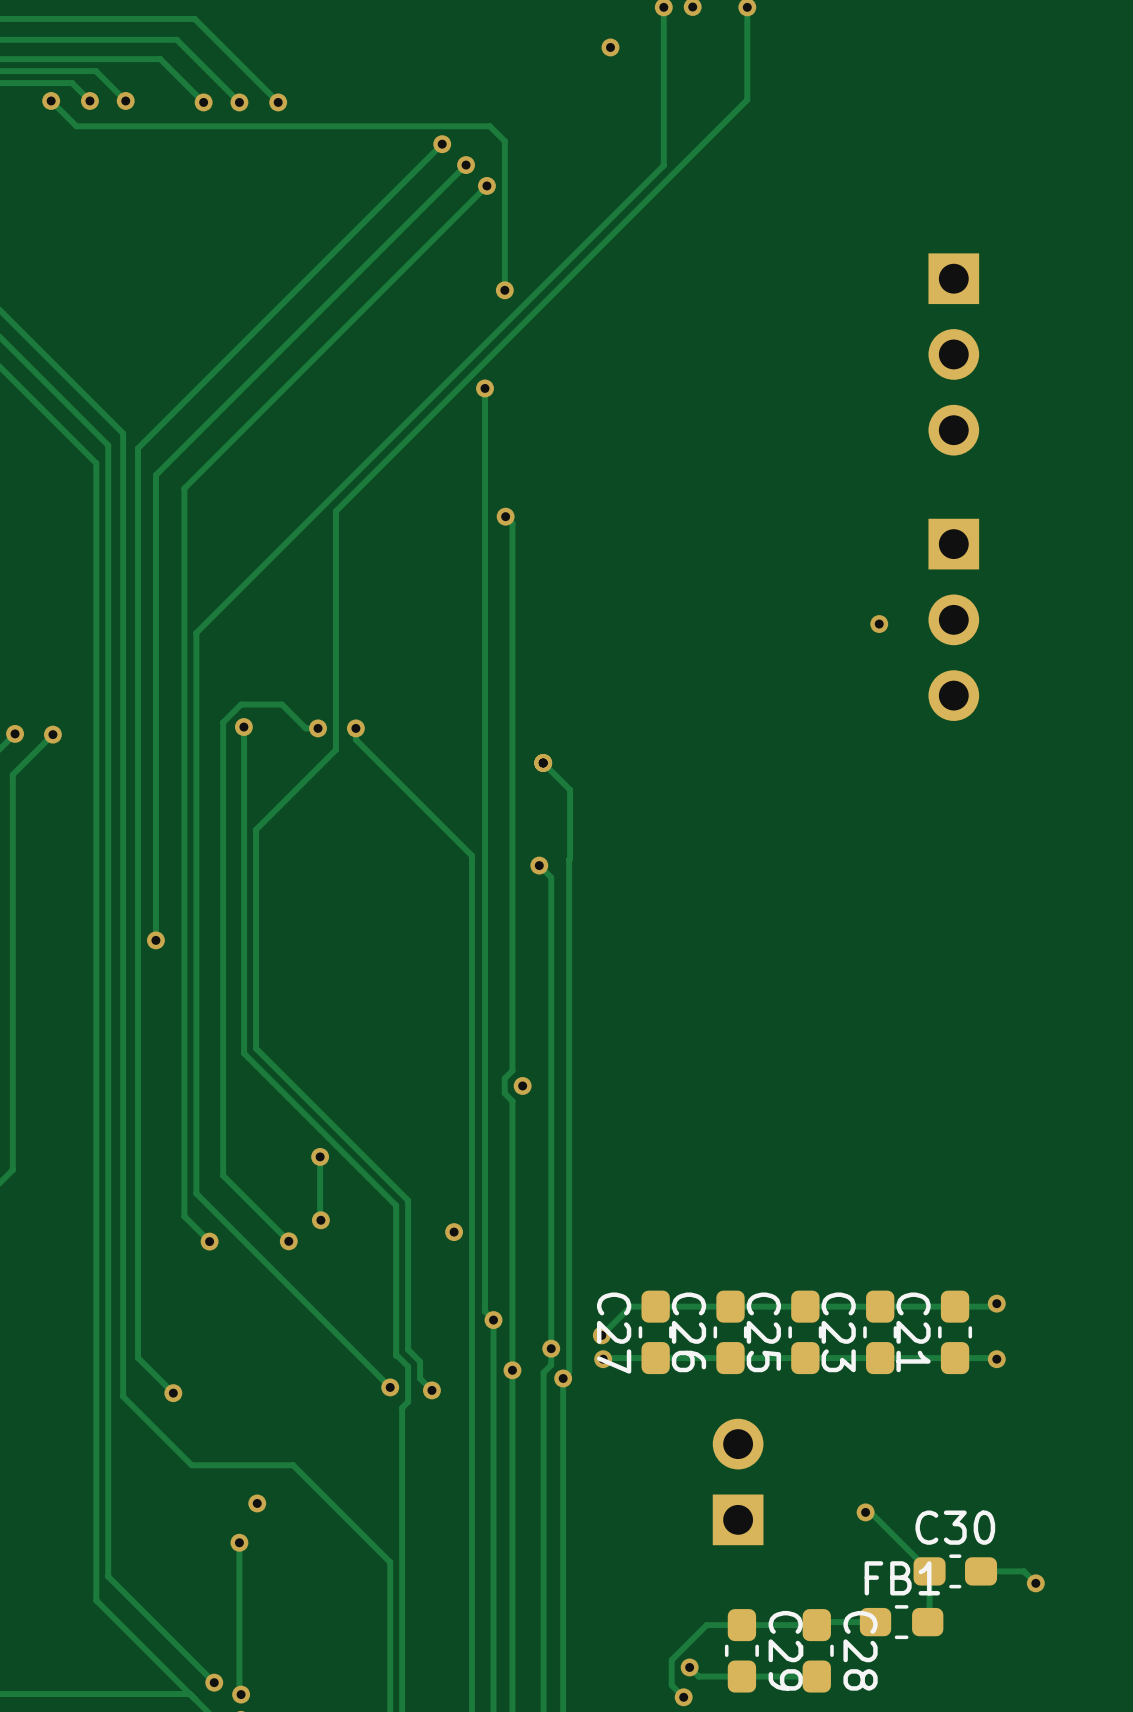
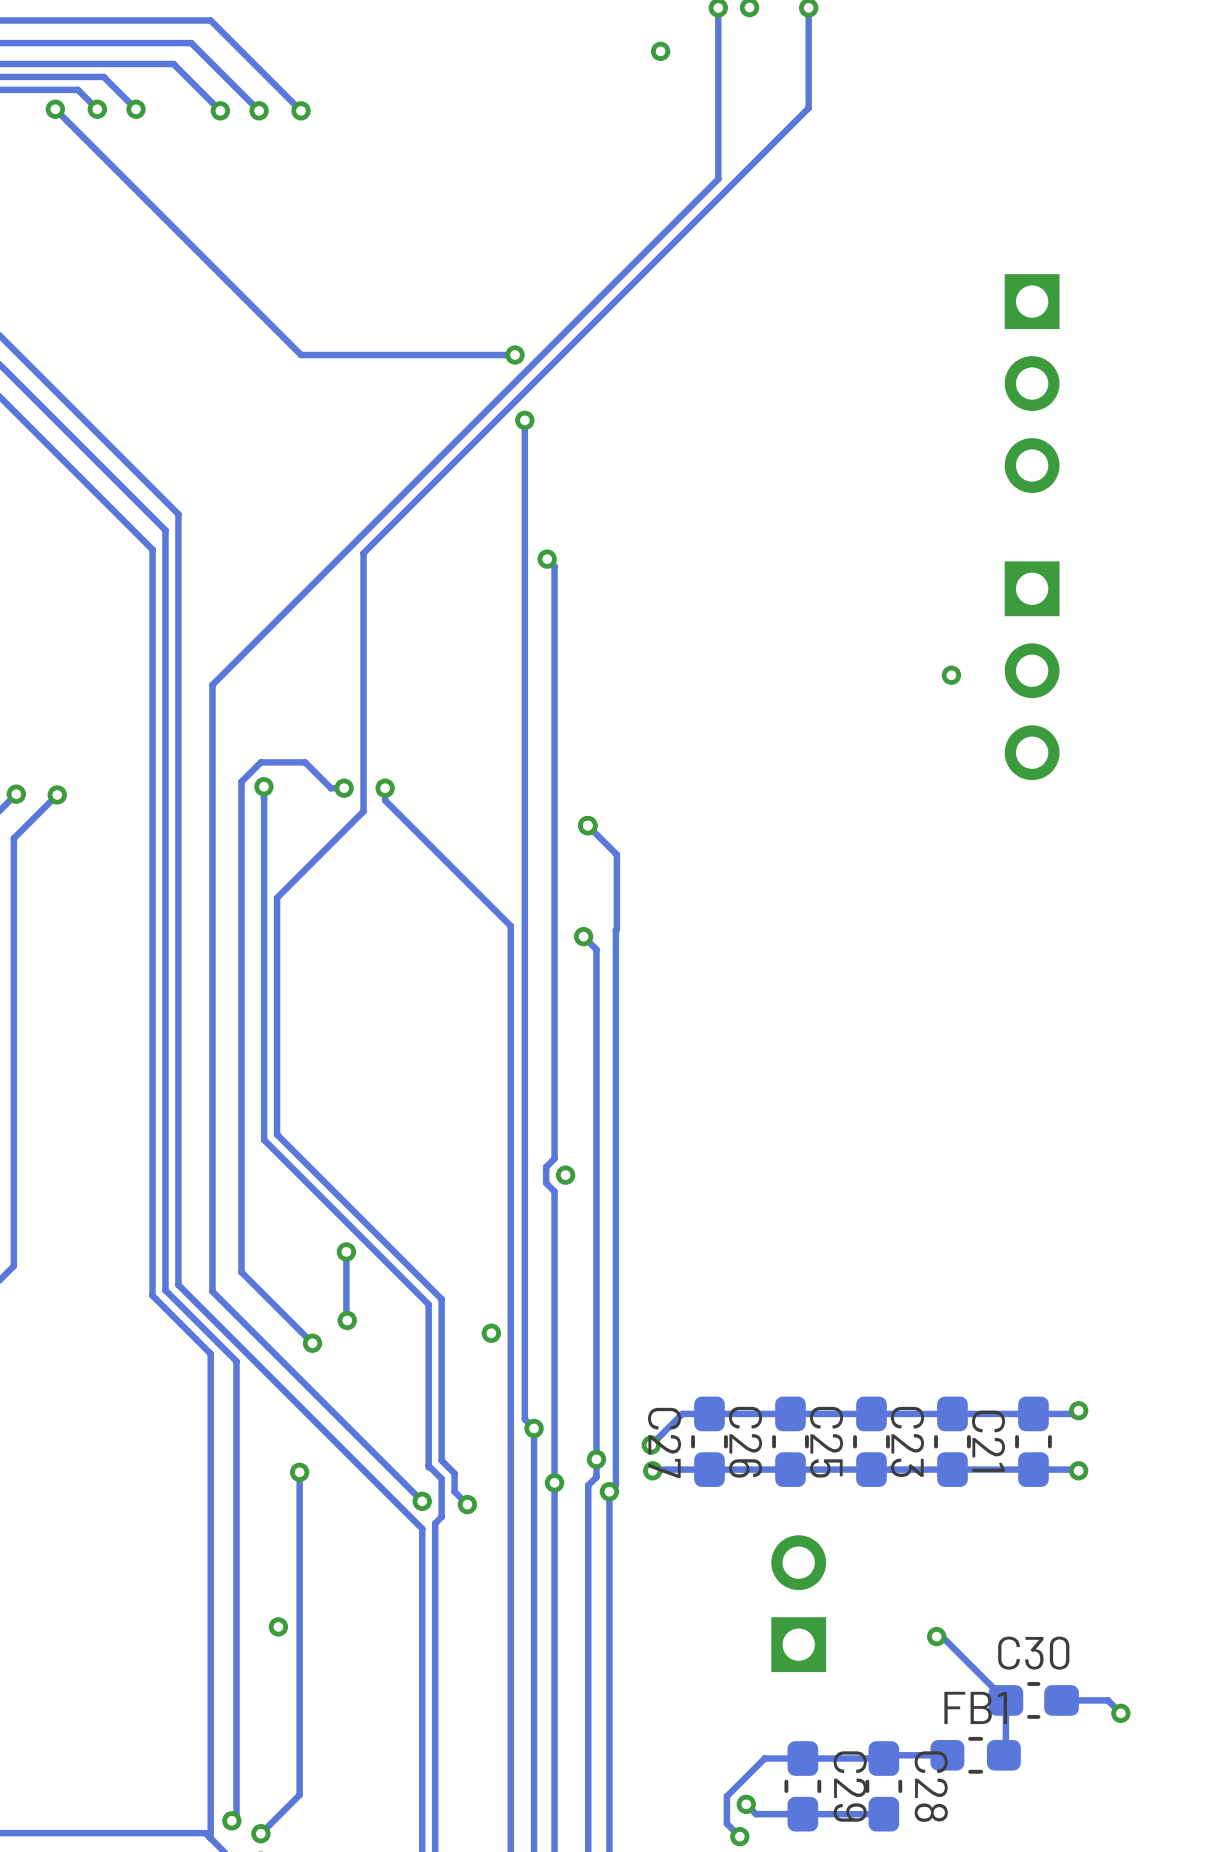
track: (76, 126) (489, 126) (504, 141) (504, 290) -> (82, 136) (301, 355) (515, 355)
track: (442, 144) (138, 448) (138, 1357) (170, 1390) -> none
via: (442, 144) -> none
track: (466, 165) (155, 475) (155, 940) -> none
via: (466, 165) -> none
track: (486, 185) (184, 488) (184, 1216) (209, 1241) -> none
via: (486, 185) -> none
via position: (504, 290) -> (515, 355)
track: (123, 433) (123, 1396) (191, 1465) (293, 1465) (390, 1562) -> (133, 469) (178, 514) (178, 1284) (422, 1528) (422, 1690)
track: (108, 445) (108, 1576) (214, 1682) -> (117, 481) (165, 530) (165, 1290) (236, 1361) (236, 1816) (231, 1820)
track: (96, 463) (96, 1600) (189, 1694) -> (104, 501) (152, 549) (152, 1295) (210, 1353) (210, 1838)
via: (155, 940) -> none
via: (209, 1241) -> none
via: none -> (299, 1472)
via: (173, 1393) -> none
track: (239, 1542) (239, 1692) (241, 1694) -> (299, 1472) (299, 1795) (260, 1833)
via: (239, 1542) -> none

